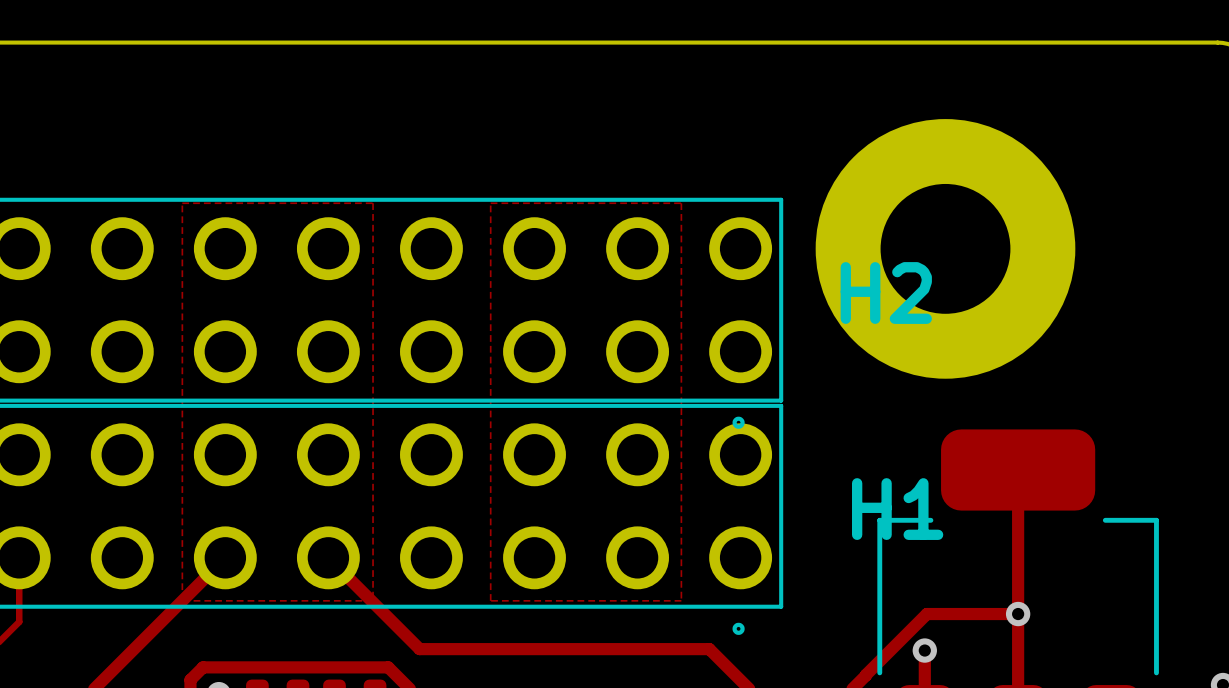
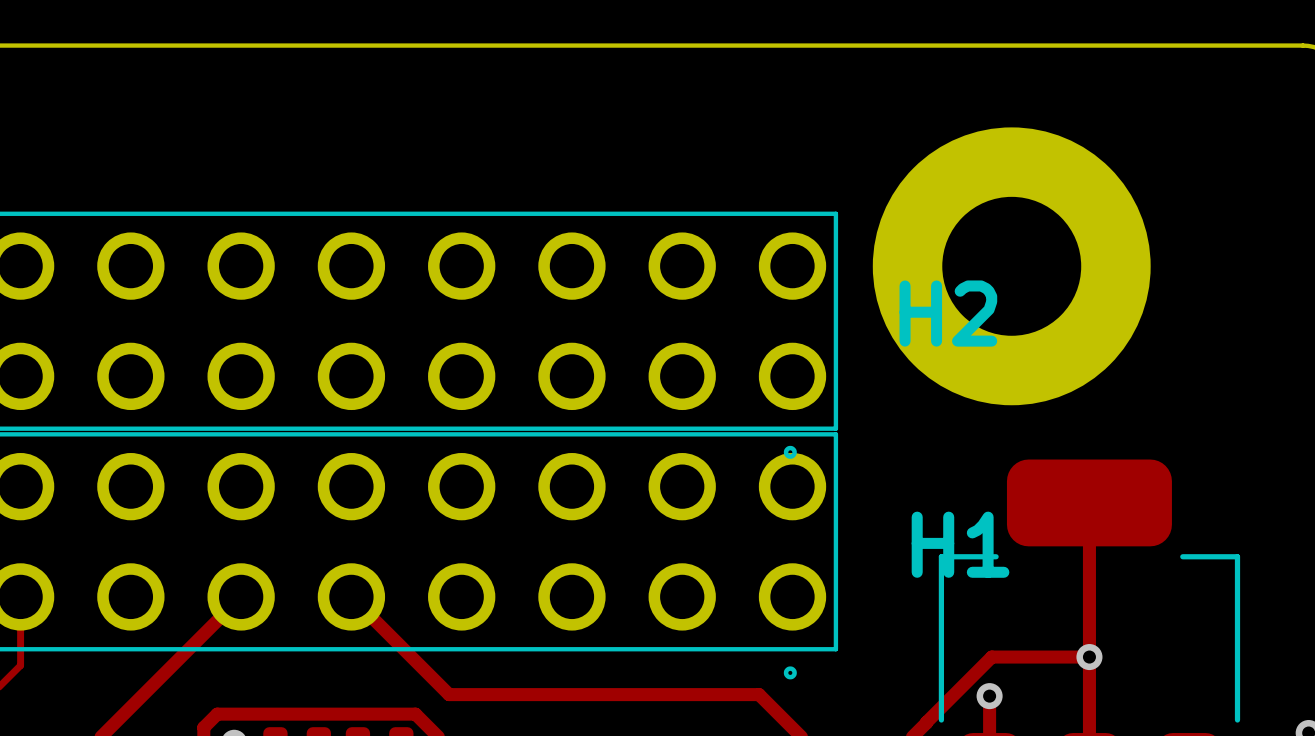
zone outline: (182, 203) (373, 203) (373, 600) (182, 600) (182, 203) -> none
zone outline: (490, 203) (681, 203) (681, 600) (490, 600) (490, 203) -> none

